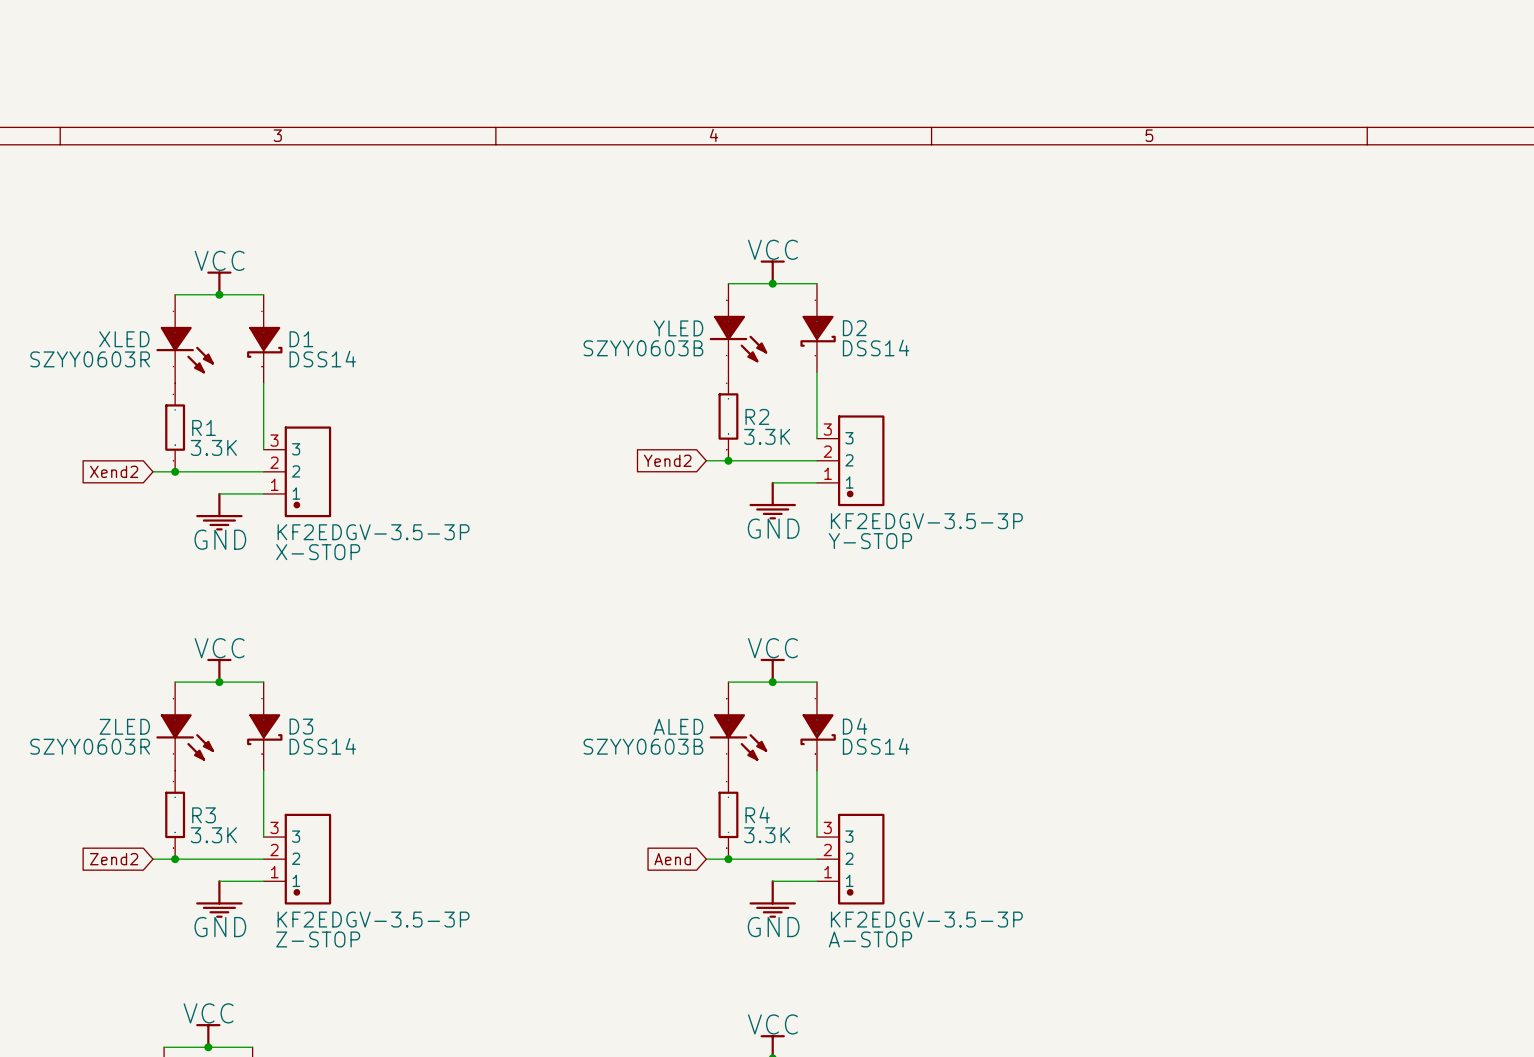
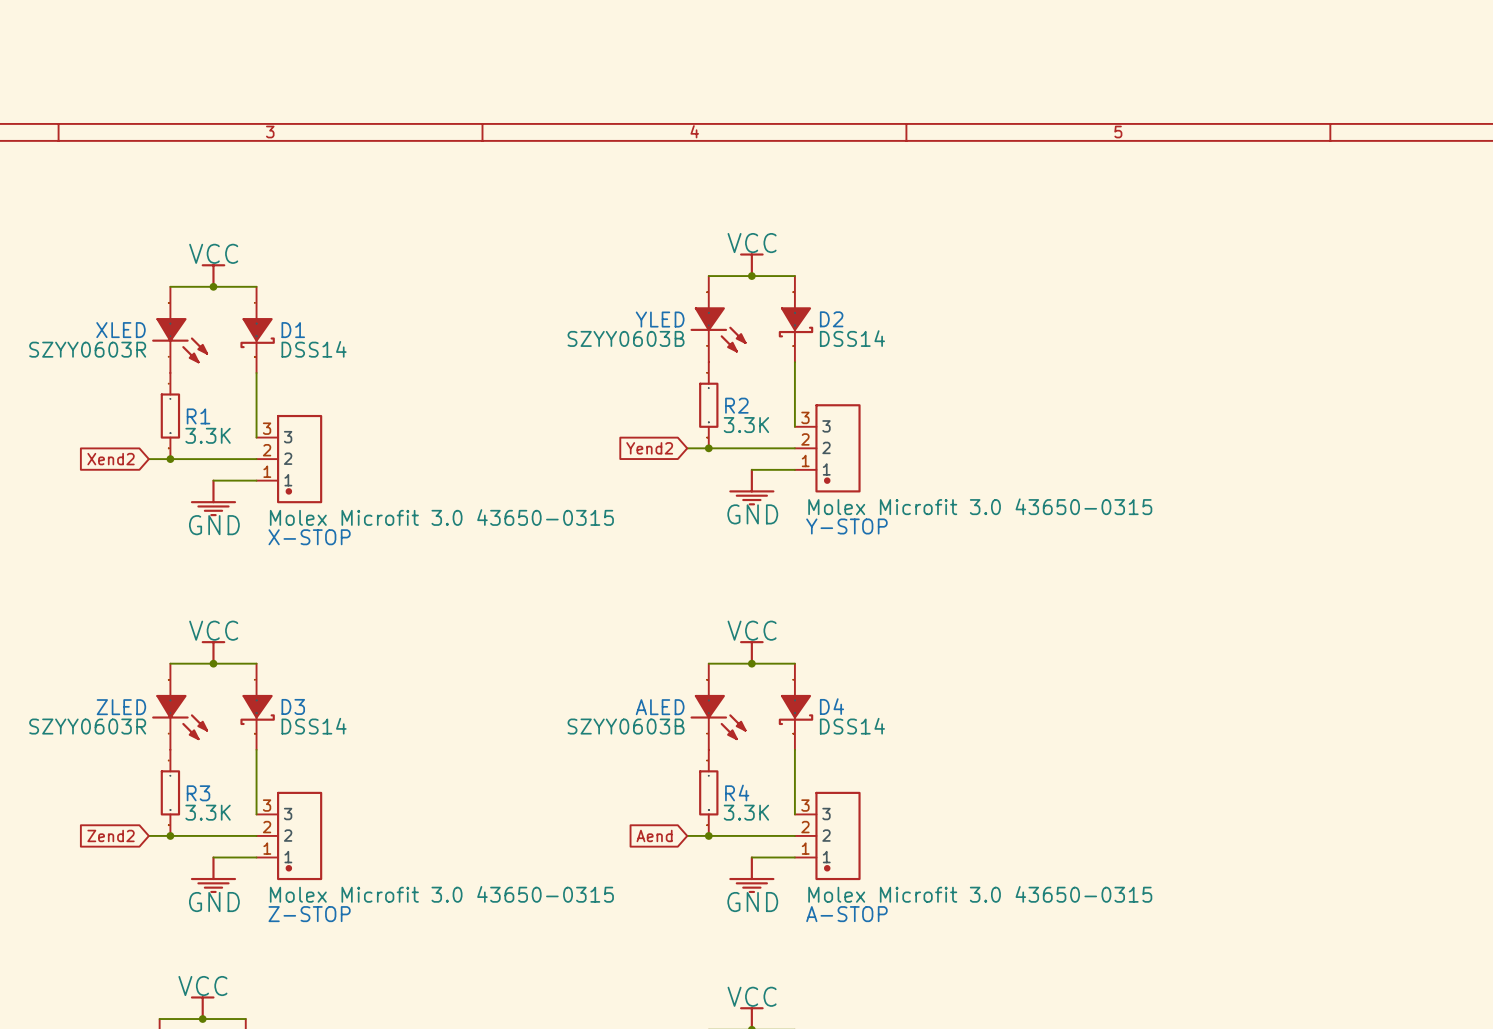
Y-STOP value: KF2EDGV-3.5-3P (926, 521) -> Molex Microfit 3.0 43650-0315 (980, 506)
X-STOP value: KF2EDGV-3.5-3P (373, 532) -> Molex Microfit 3.0 43650-0315 (441, 517)
Z-STOP value: KF2EDGV-3.5-3P (373, 919) -> Molex Microfit 3.0 43650-0315 (441, 894)
A-STOP value: KF2EDGV-3.5-3P (926, 919) -> Molex Microfit 3.0 43650-0315 (980, 894)

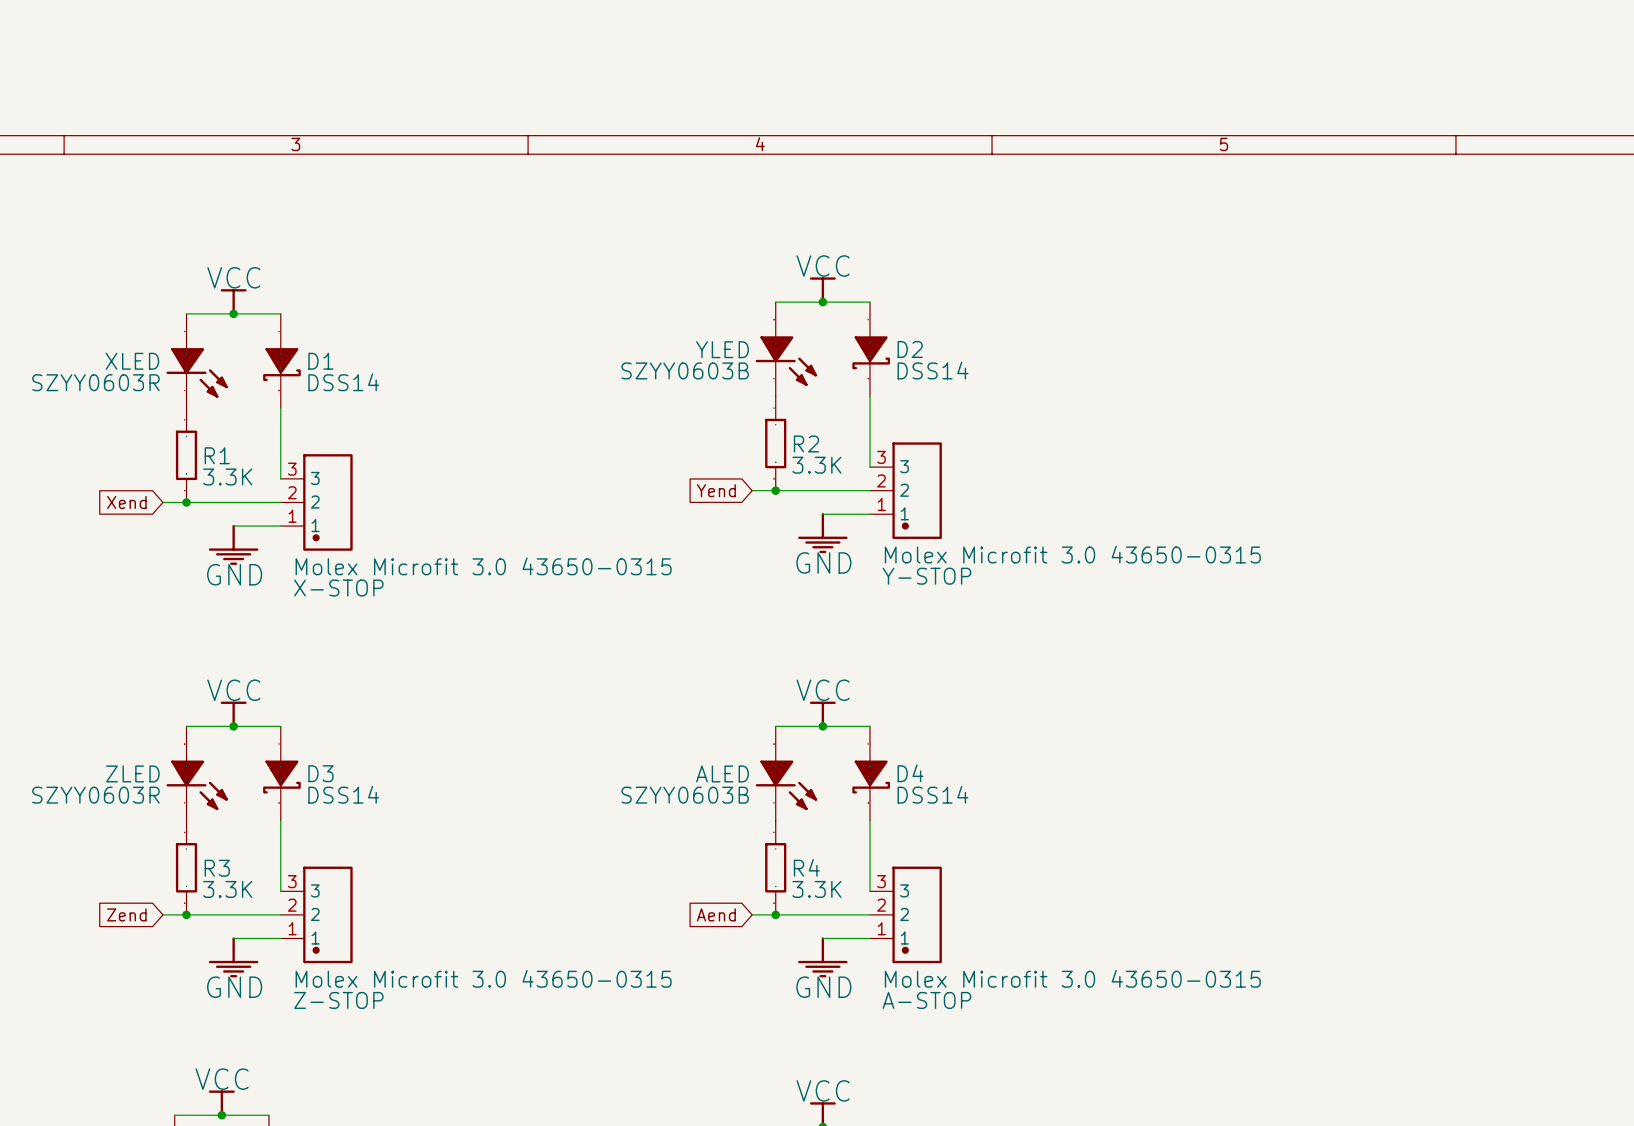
global label: Yend2 (649, 448) -> Yend (716, 490)
global label: Xend2 (111, 459) -> Xend (126, 502)
global label: Zend2 (111, 835) -> Zend (126, 914)

